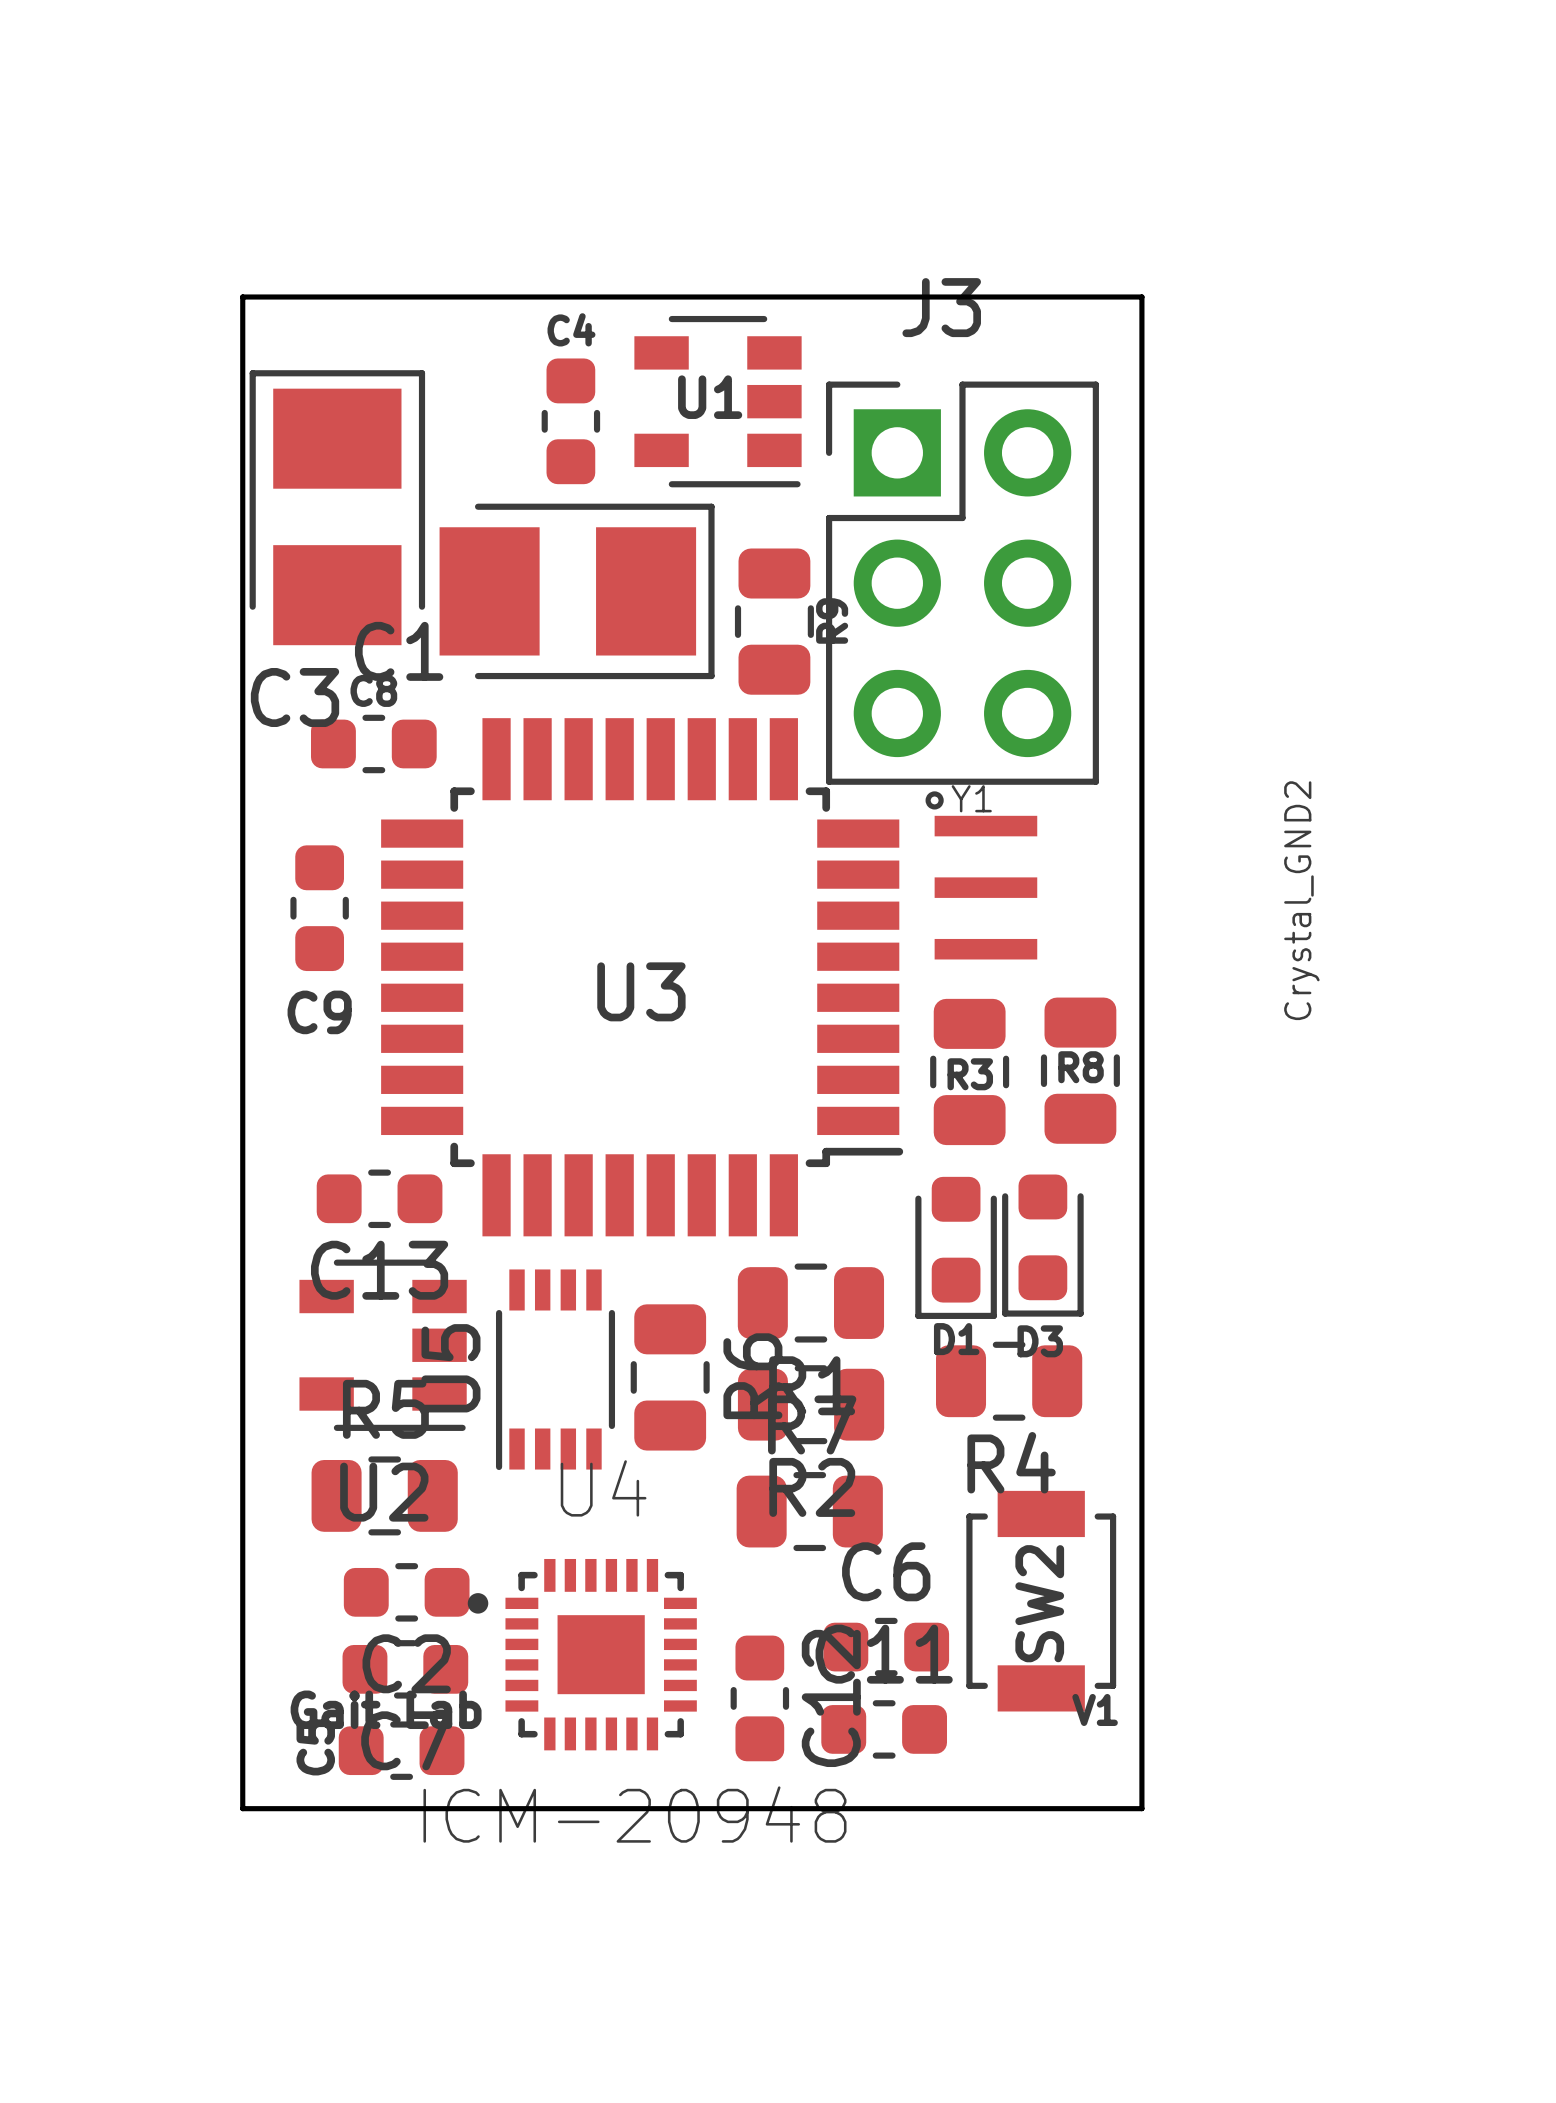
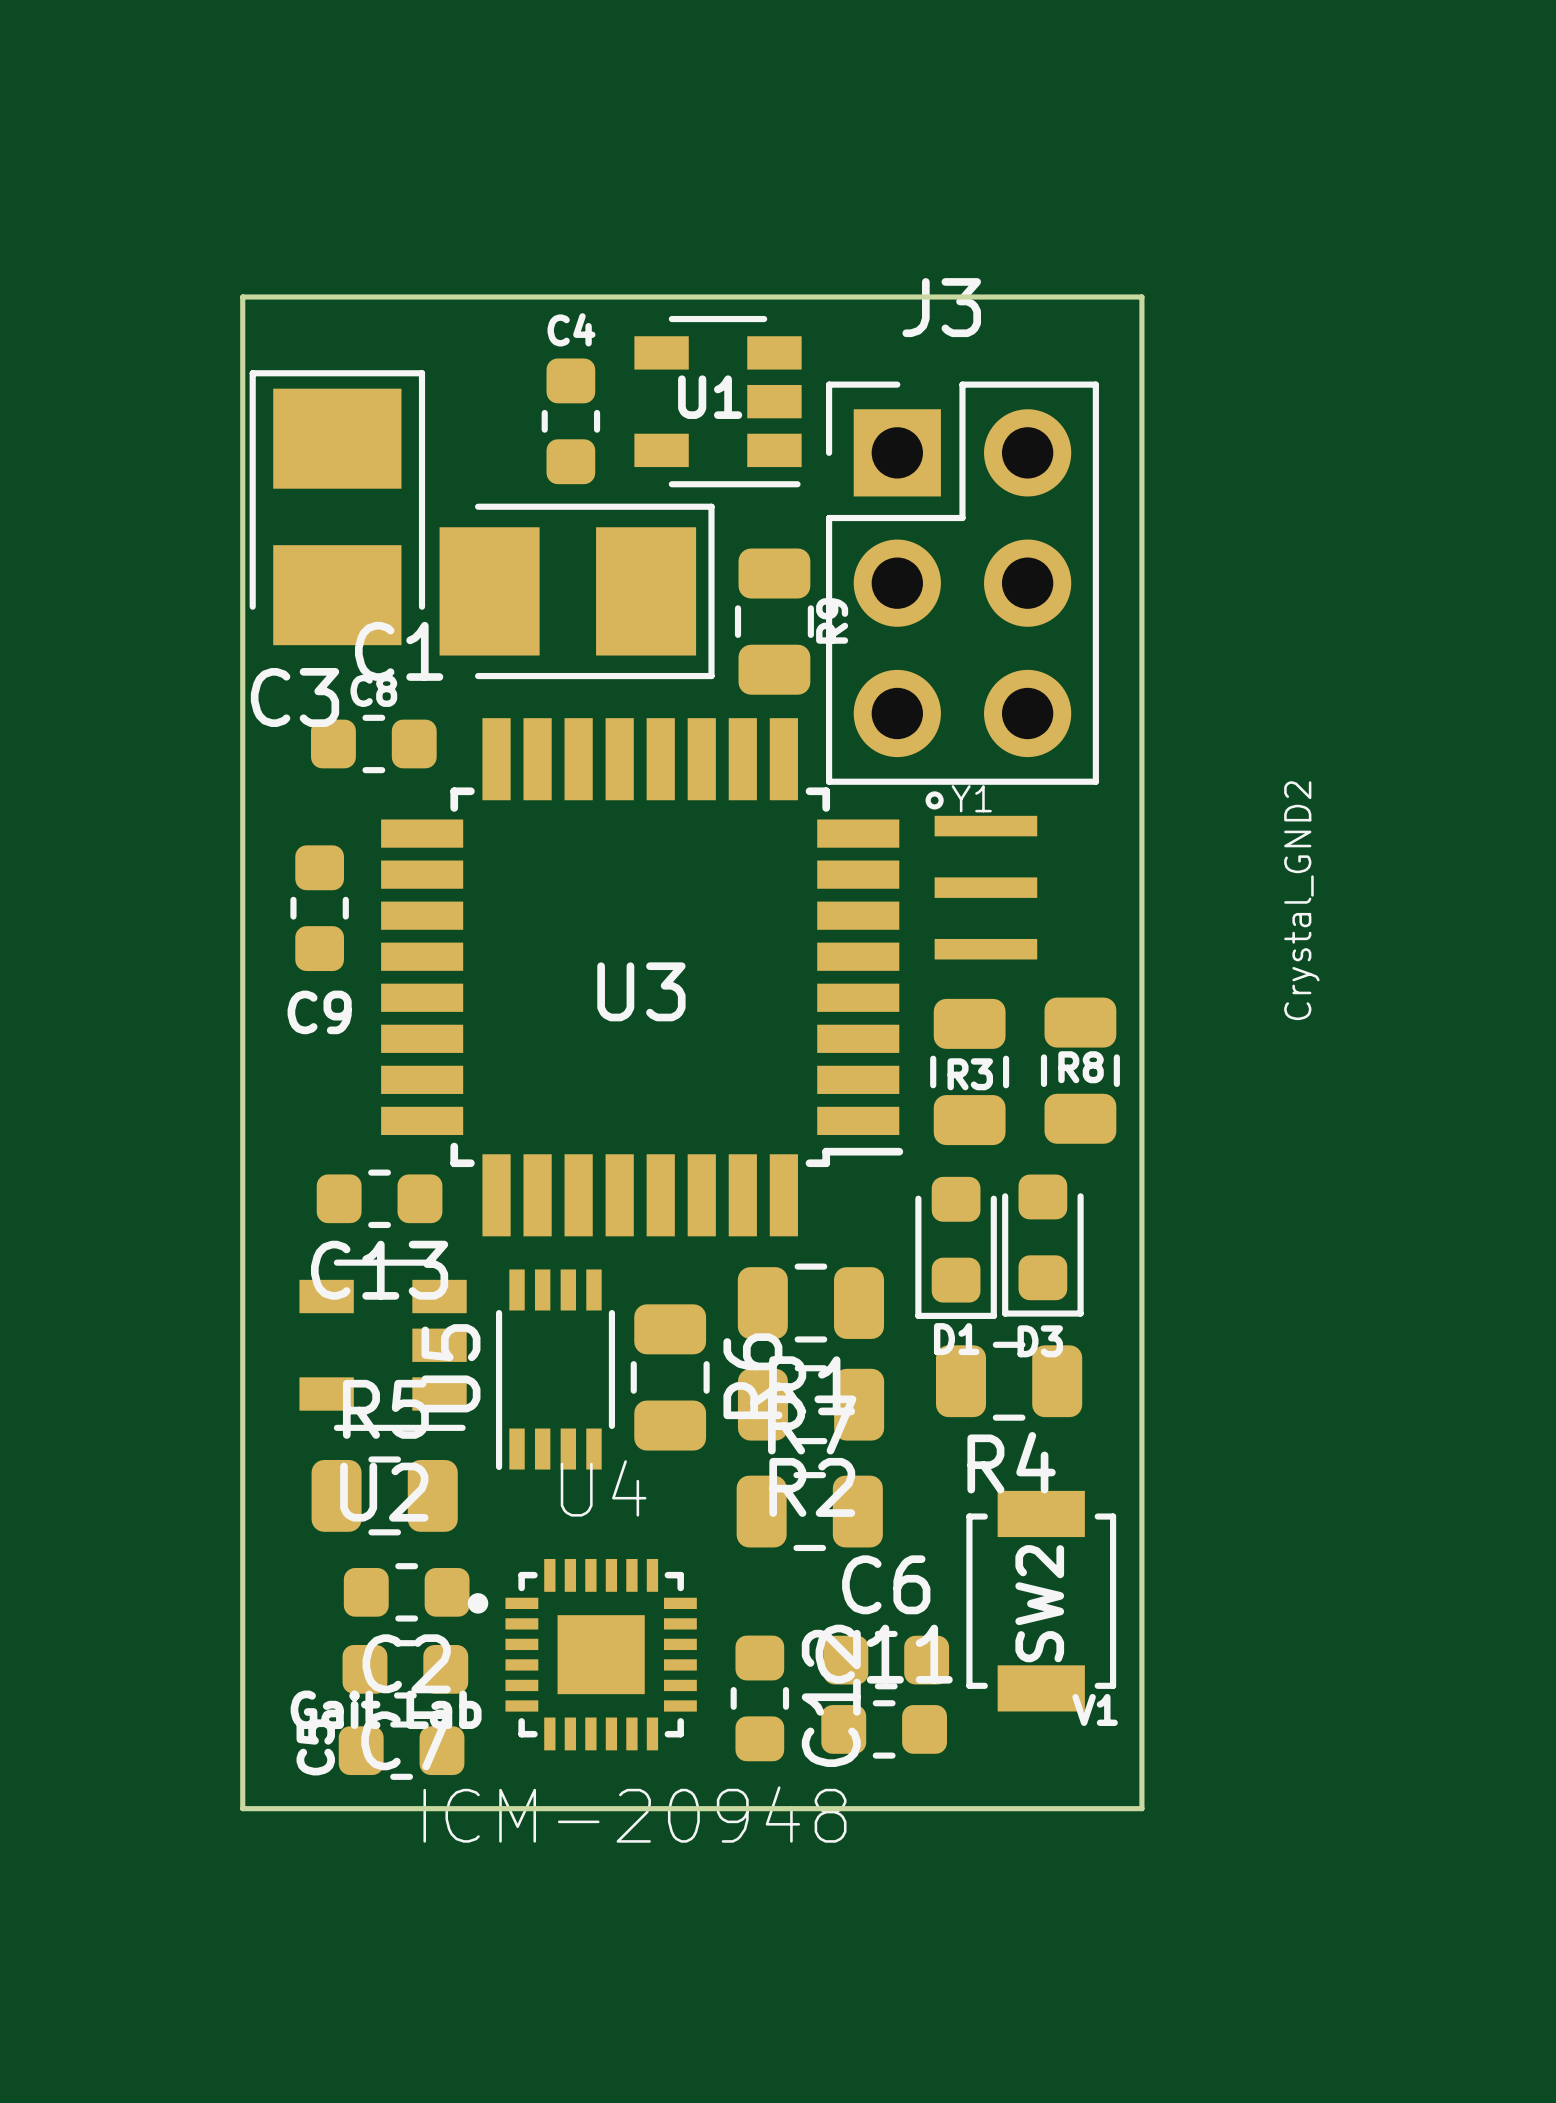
C6 position: (886, 1647) -> (886, 1660)

